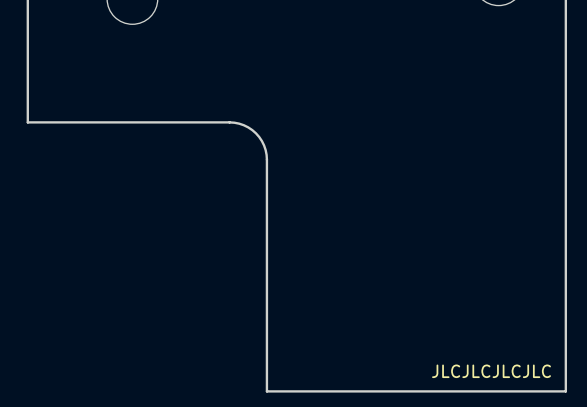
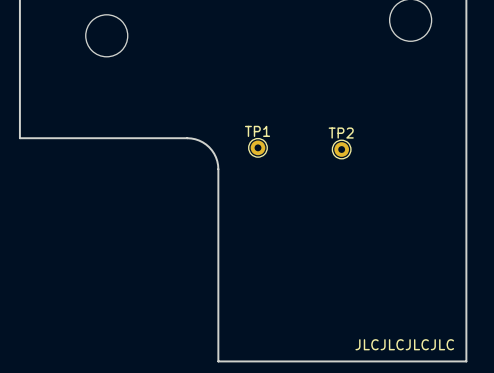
part: none -> (257, 147)
part: none -> (341, 149)

